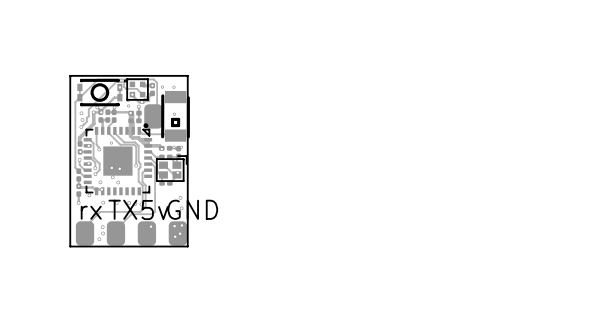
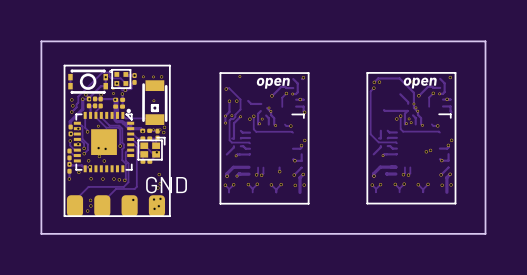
board edge: none -> (41, 41) (485, 41) (485, 233) (41, 233) (41, 41)
line: none -> (64, 65) (169, 65) (169, 216) (64, 216) (64, 65)
board edge: (70, 75) (187, 75) (187, 246) (70, 246) (70, 75) -> none
line: none -> (220, 73) (308, 73) (308, 203) (220, 203) (220, 73)
line: none -> (367, 72) (455, 72) (455, 203) (367, 203) (367, 72)
via: none -> (239, 76)
via: none -> (161, 76)
via: none -> (450, 77)
via: none -> (303, 77)
track: none -> (293, 79) (297, 83) (297, 92) (292, 94)
track: none -> (440, 78) (444, 83) (444, 92) (439, 93)
track: none -> (374, 82) (378, 78) (399, 78) (413, 92) (413, 108) (421, 118) (421, 124)
via: none -> (374, 82)
via: none -> (379, 82)
text: none -> open (273, 83)
text: none -> open (420, 83)
track: none -> (293, 88) (281, 86) (271, 95)
track: none -> (373, 88) (370, 91) (370, 134) (378, 142) (396, 143)
via: none -> (373, 88)
track: none -> (440, 87) (428, 86) (419, 95)
track: none -> (226, 89) (229, 88) (240, 99) (240, 109) (235, 117) (229, 120) (229, 140) (231, 142) (250, 143)
via: none -> (226, 89)
track: none -> (286, 93) (282, 97) (282, 106)
via: none -> (286, 93)
track: none -> (433, 93) (429, 97) (429, 106)
via: none -> (433, 93)
via: none -> (292, 94)
track: none -> (400, 94) (408, 103)
via: none -> (439, 93)
via: none -> (271, 95)
via: none -> (418, 95)
via: none -> (300, 99)
track: none -> (443, 99) (450, 99)
via: none -> (447, 99)
track: none -> (296, 99) (303, 99)
track: none -> (229, 101) (229, 111) (225, 116) (225, 123)
via: none -> (229, 101)
via: none -> (236, 101)
track: none -> (248, 100) (251, 103) (261, 103)
part: (153, 116) -> none
via: none -> (413, 103)
track: (153, 118) (157, 114) (157, 82) (153, 79) (98, 79) (75, 102) (75, 167) (78, 171) -> none
track: none -> (296, 106) (303, 106) (304, 112)
track: none -> (443, 106) (450, 106) (451, 112)
track: none -> (267, 108) (274, 118) (274, 124)
via: none -> (269, 108)
via: none -> (415, 107)
track: none -> (383, 110) (407, 110) (404, 113) (404, 124)
track: none -> (260, 111) (258, 113) (258, 124)
via: none -> (270, 111)
via: none -> (417, 111)
via: none -> (304, 112)
line: none -> (292, 114) (303, 114) (303, 118)
line: none -> (439, 114) (450, 114) (450, 117)
track: none -> (266, 115) (268, 118) (268, 124)
track: none -> (413, 115) (415, 118) (415, 124)
via: none -> (225, 116)
via: none -> (231, 115)
track: none -> (253, 116) (253, 129) (256, 131) (293, 132)
via: none -> (253, 116)
track: none -> (400, 116) (400, 129) (403, 131) (439, 132)
via: none -> (400, 116)
track: none -> (240, 116) (233, 123) (233, 138) (232, 138)
via: none -> (240, 116)
via: none -> (262, 119)
via: none -> (396, 119)
via: none -> (409, 118)
via: none -> (249, 119)
via: none -> (225, 123)
via: none -> (411, 122)
via: none -> (259, 123)
via: none -> (406, 123)
track: none -> (284, 124) (290, 126)
track: none -> (431, 124) (437, 125)
via: none -> (275, 125)
via: none -> (290, 126)
via: none -> (422, 125)
via: none -> (437, 125)
via: none -> (164, 127)
track: none -> (240, 130) (250, 132)
track: none -> (380, 130) (380, 138) (379, 138)
track: none -> (387, 130) (396, 132)
via: none -> (163, 132)
track: none -> (250, 138) (240, 138)
track: none -> (396, 137) (387, 138)
via: none -> (304, 140)
via: none -> (451, 140)
track: none -> (301, 145) (300, 148) (293, 148)
via: none -> (301, 145)
track: none -> (448, 145) (447, 148) (439, 148)
via: none -> (448, 145)
track: none -> (233, 146) (226, 154)
track: none -> (240, 146) (250, 148)
track: none -> (380, 146) (373, 154)
track: none -> (387, 146) (396, 148)
via: none -> (430, 150)
via: none -> (426, 151)
track: none -> (250, 154) (236, 155)
track: none -> (301, 154) (301, 160) (293, 159)
track: none -> (396, 153) (383, 155)
track: none -> (448, 154) (448, 160) (439, 159)
via: none -> (236, 155)
via: none -> (383, 155)
via: none -> (294, 160)
via: none -> (441, 160)
track: none -> (248, 167) (233, 167) (226, 173) (227, 176)
track: none -> (258, 167) (256, 174)
track: none -> (263, 167) (261, 175)
track: none -> (279, 167) (279, 171)
track: none -> (395, 167) (380, 167) (373, 173) (373, 176)
track: none -> (404, 167) (403, 174)
track: none -> (410, 167) (408, 175)
track: none -> (448, 167) (441, 174)
track: none -> (301, 167) (294, 175)
via: none -> (279, 171)
track: none -> (386, 173) (395, 174)
track: none -> (248, 174) (239, 173) (236, 176)
track: none -> (303, 174) (300, 177) (300, 192)
via: none -> (303, 174)
track: none -> (450, 174) (446, 177) (446, 192)
via: none -> (450, 174)
via: none -> (256, 174)
via: none -> (261, 175)
via: none -> (294, 175)
via: none -> (403, 174)
via: none -> (408, 175)
via: none -> (441, 174)
via: none -> (227, 176)
via: none -> (236, 176)
via: none -> (373, 176)
track: none -> (257, 184) (252, 188)
via: none -> (257, 184)
track: none -> (404, 184) (399, 188)
via: none -> (404, 184)
text: TX (122, 209) -> none
track: none -> (225, 185) (229, 188) (229, 192)
via: none -> (225, 185)
track: none -> (233, 184) (229, 189)
via: none -> (233, 184)
track: none -> (248, 184) (252, 188)
via: none -> (248, 184)
track: none -> (271, 184) (276, 189)
via: none -> (271, 184)
track: none -> (281, 184) (276, 189) (276, 192)
via: none -> (281, 184)
via: none -> (304, 185)
track: none -> (372, 185) (375, 188) (375, 192)
via: none -> (372, 185)
track: none -> (380, 184) (375, 189)
via: none -> (380, 184)
track: none -> (395, 184) (399, 188)
via: none -> (395, 184)
track: none -> (418, 184) (423, 189)
via: none -> (418, 184)
track: none -> (428, 184) (423, 189) (423, 192)
via: none -> (428, 184)
via: none -> (451, 184)
text: 5v (155, 210) -> none
via: none -> (295, 185)
via: none -> (442, 185)
text: rx (91, 212) -> none
track: none -> (399, 188) (399, 192)
track: none -> (252, 188) (252, 192)

